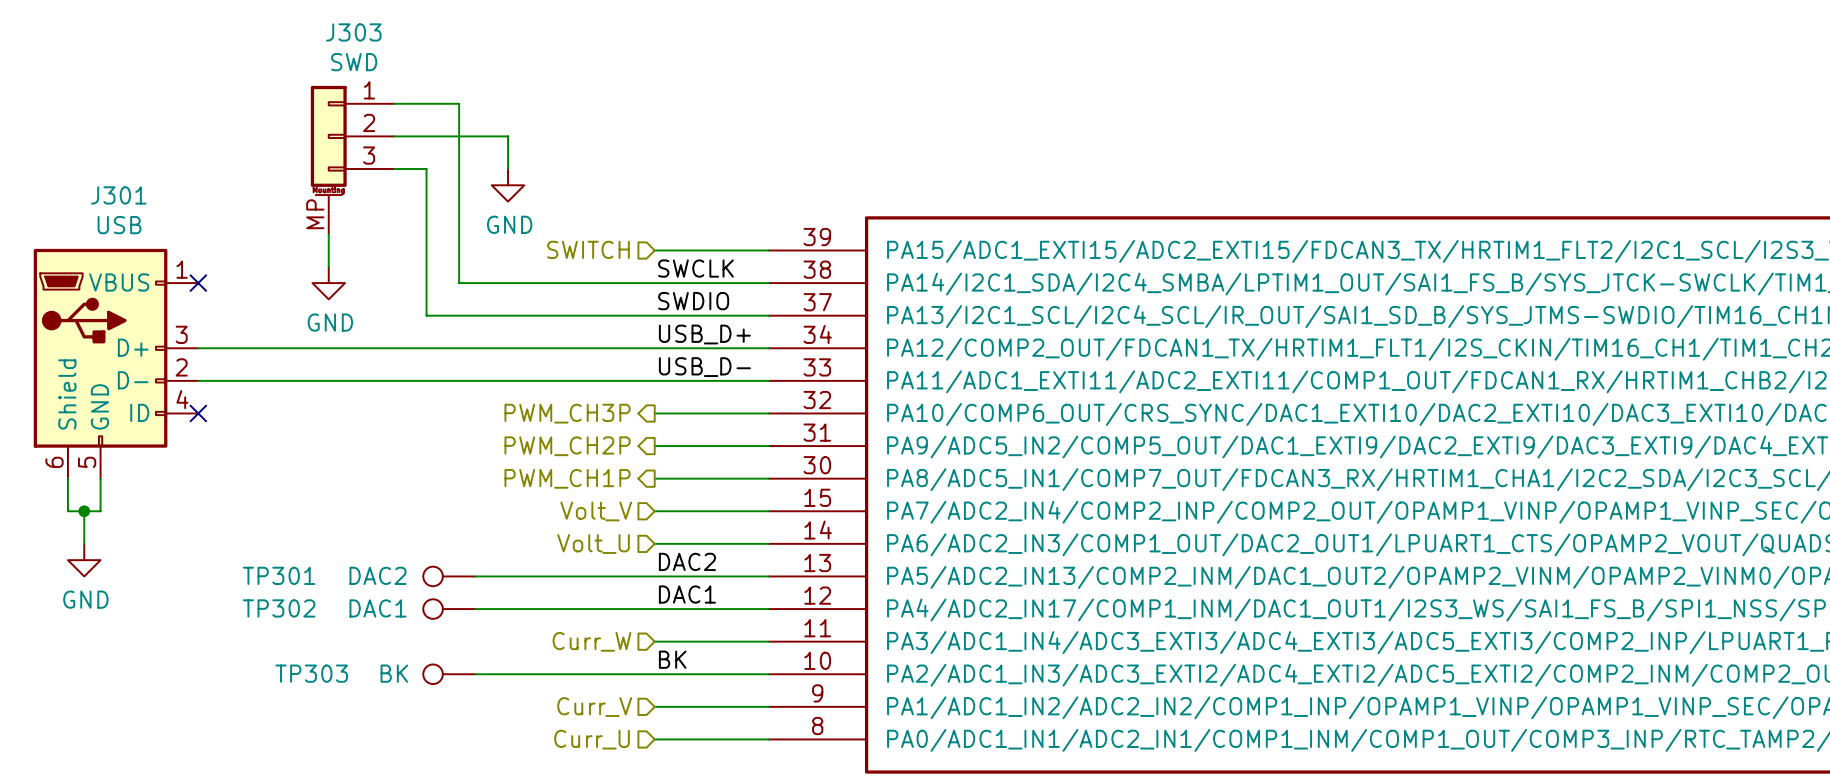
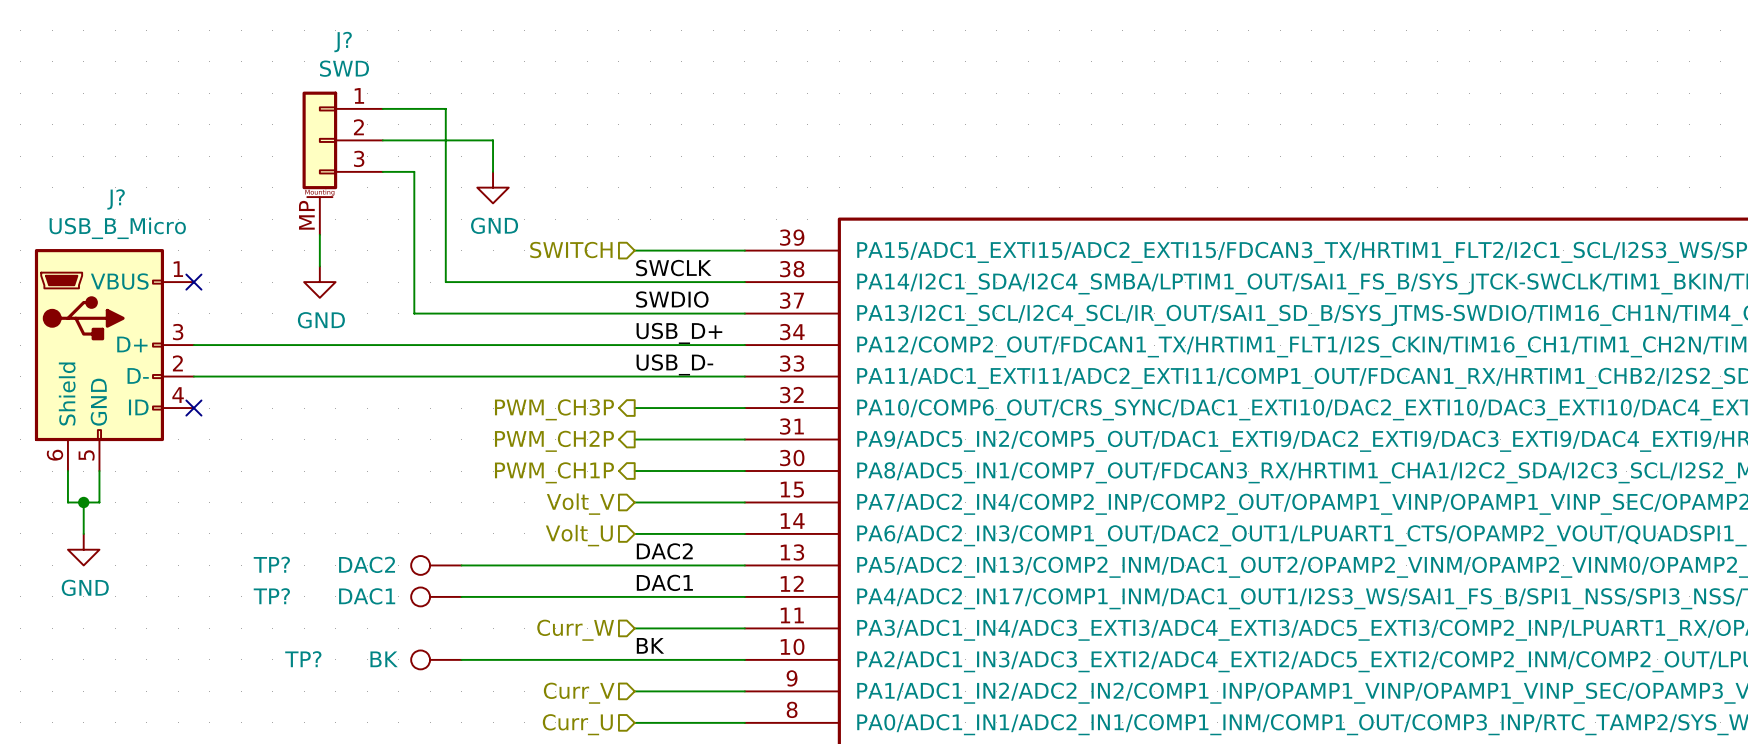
J303 name: J303 (353, 32) -> J? (343, 42)
J301 name: J301 (118, 195) -> J? (116, 199)
J301 value: USB (119, 225) -> USB_B_Micro (117, 228)
TP301 name: TP301 (279, 575) -> TP? (271, 564)
TP302 name: TP302 (279, 608) -> TP? (271, 596)
TP303 name: TP303 (311, 673) -> TP? (303, 659)

